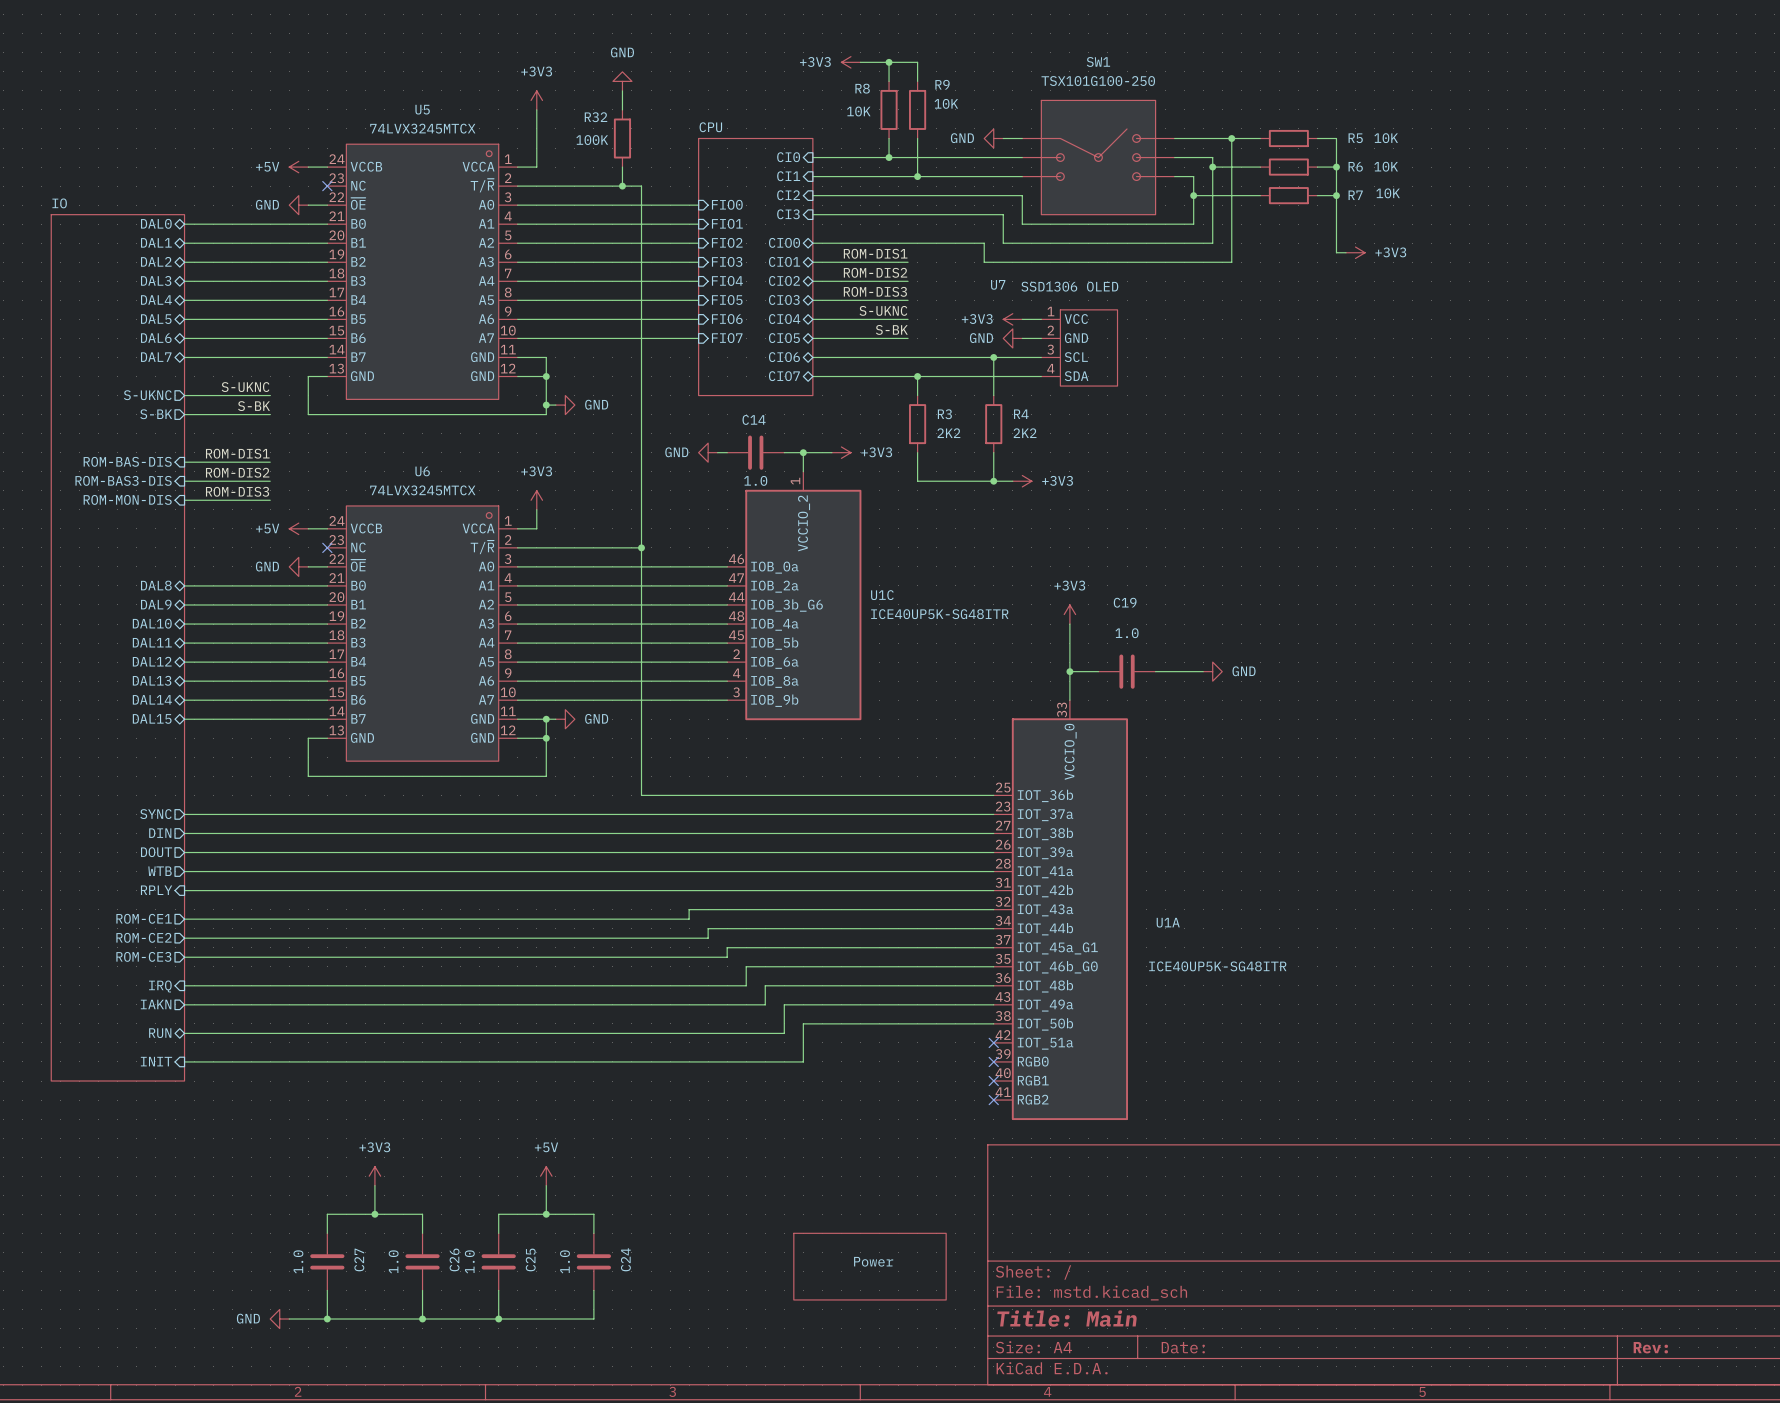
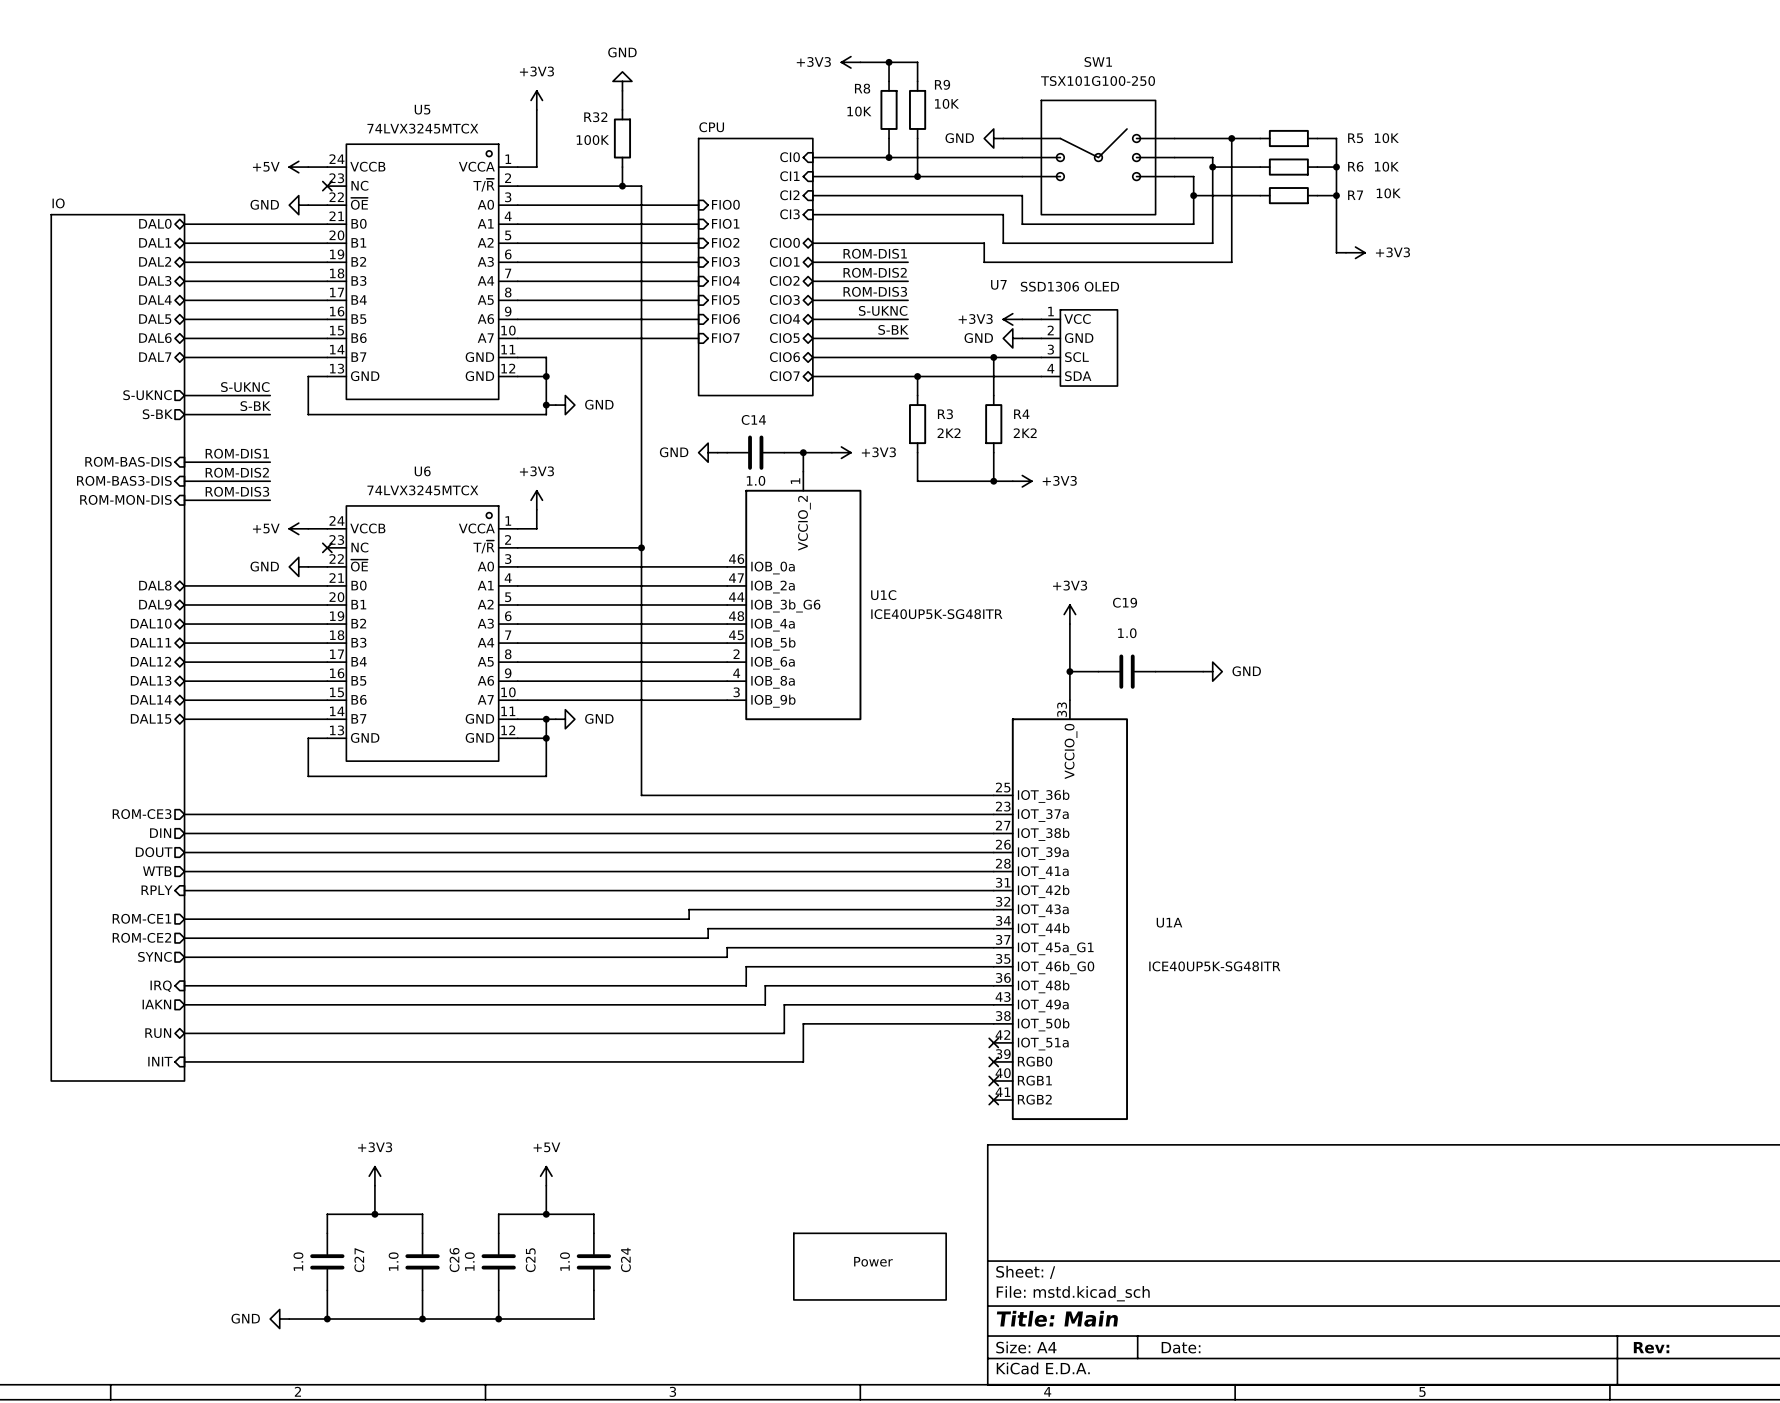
sheet pin: SYNC (155, 814) -> ROM-CE3 (142, 814)
sheet pin: ROM-CE3 (143, 956) -> SYNC (154, 956)

